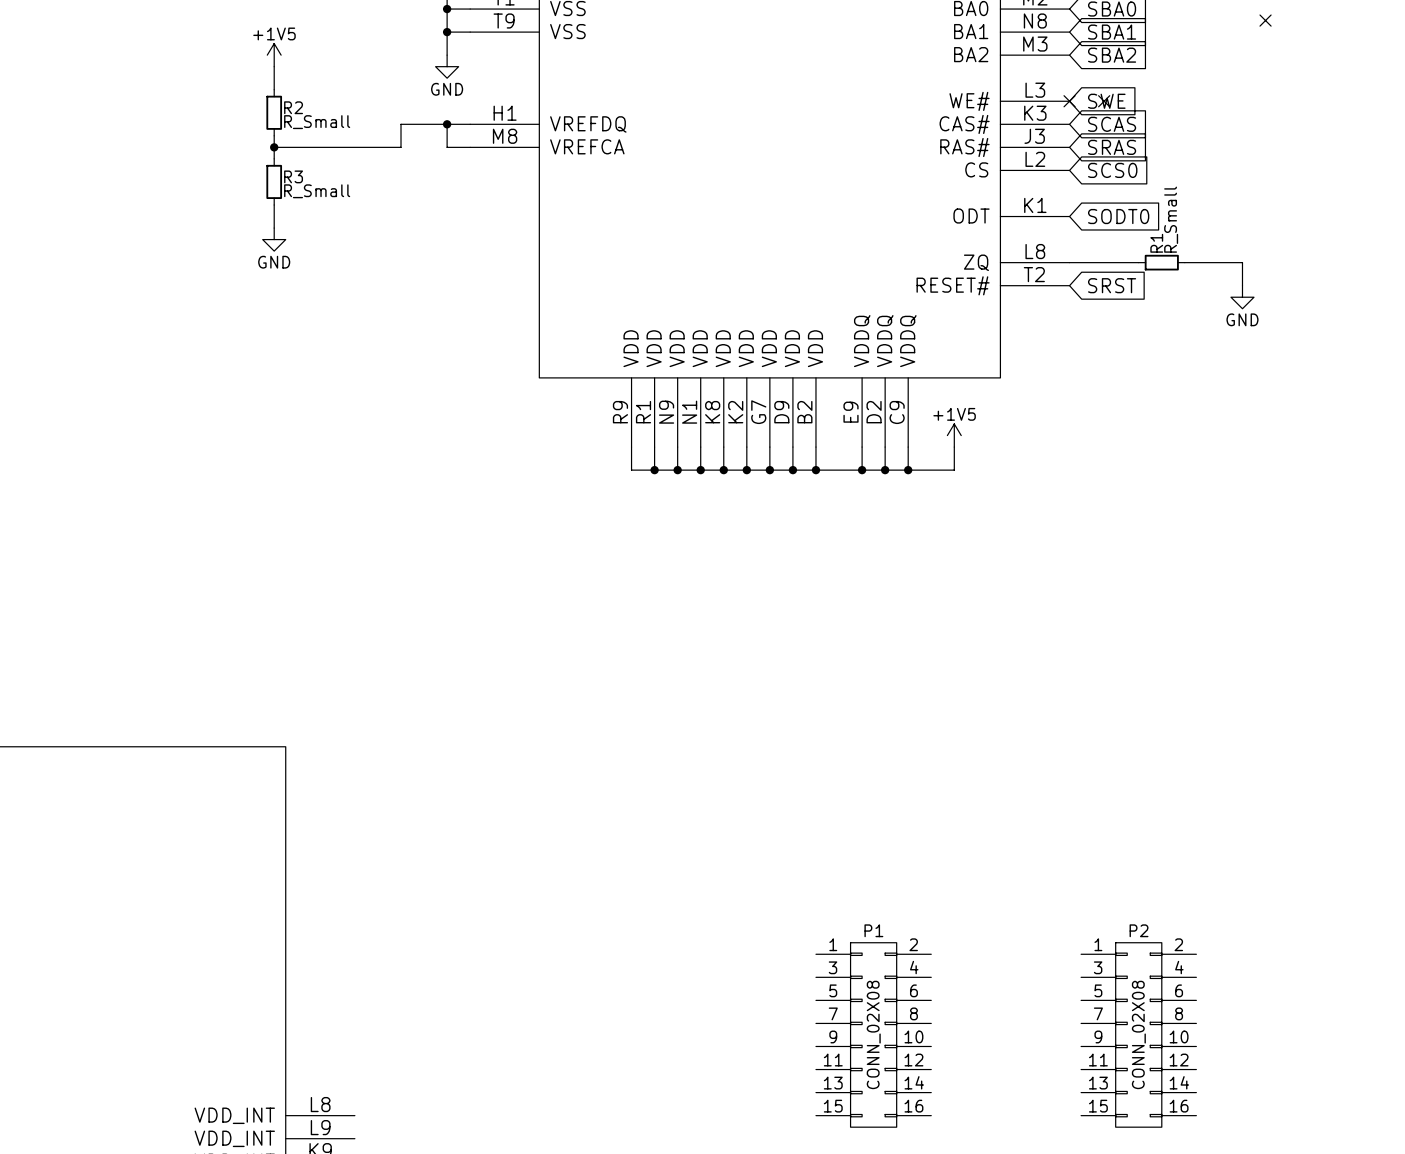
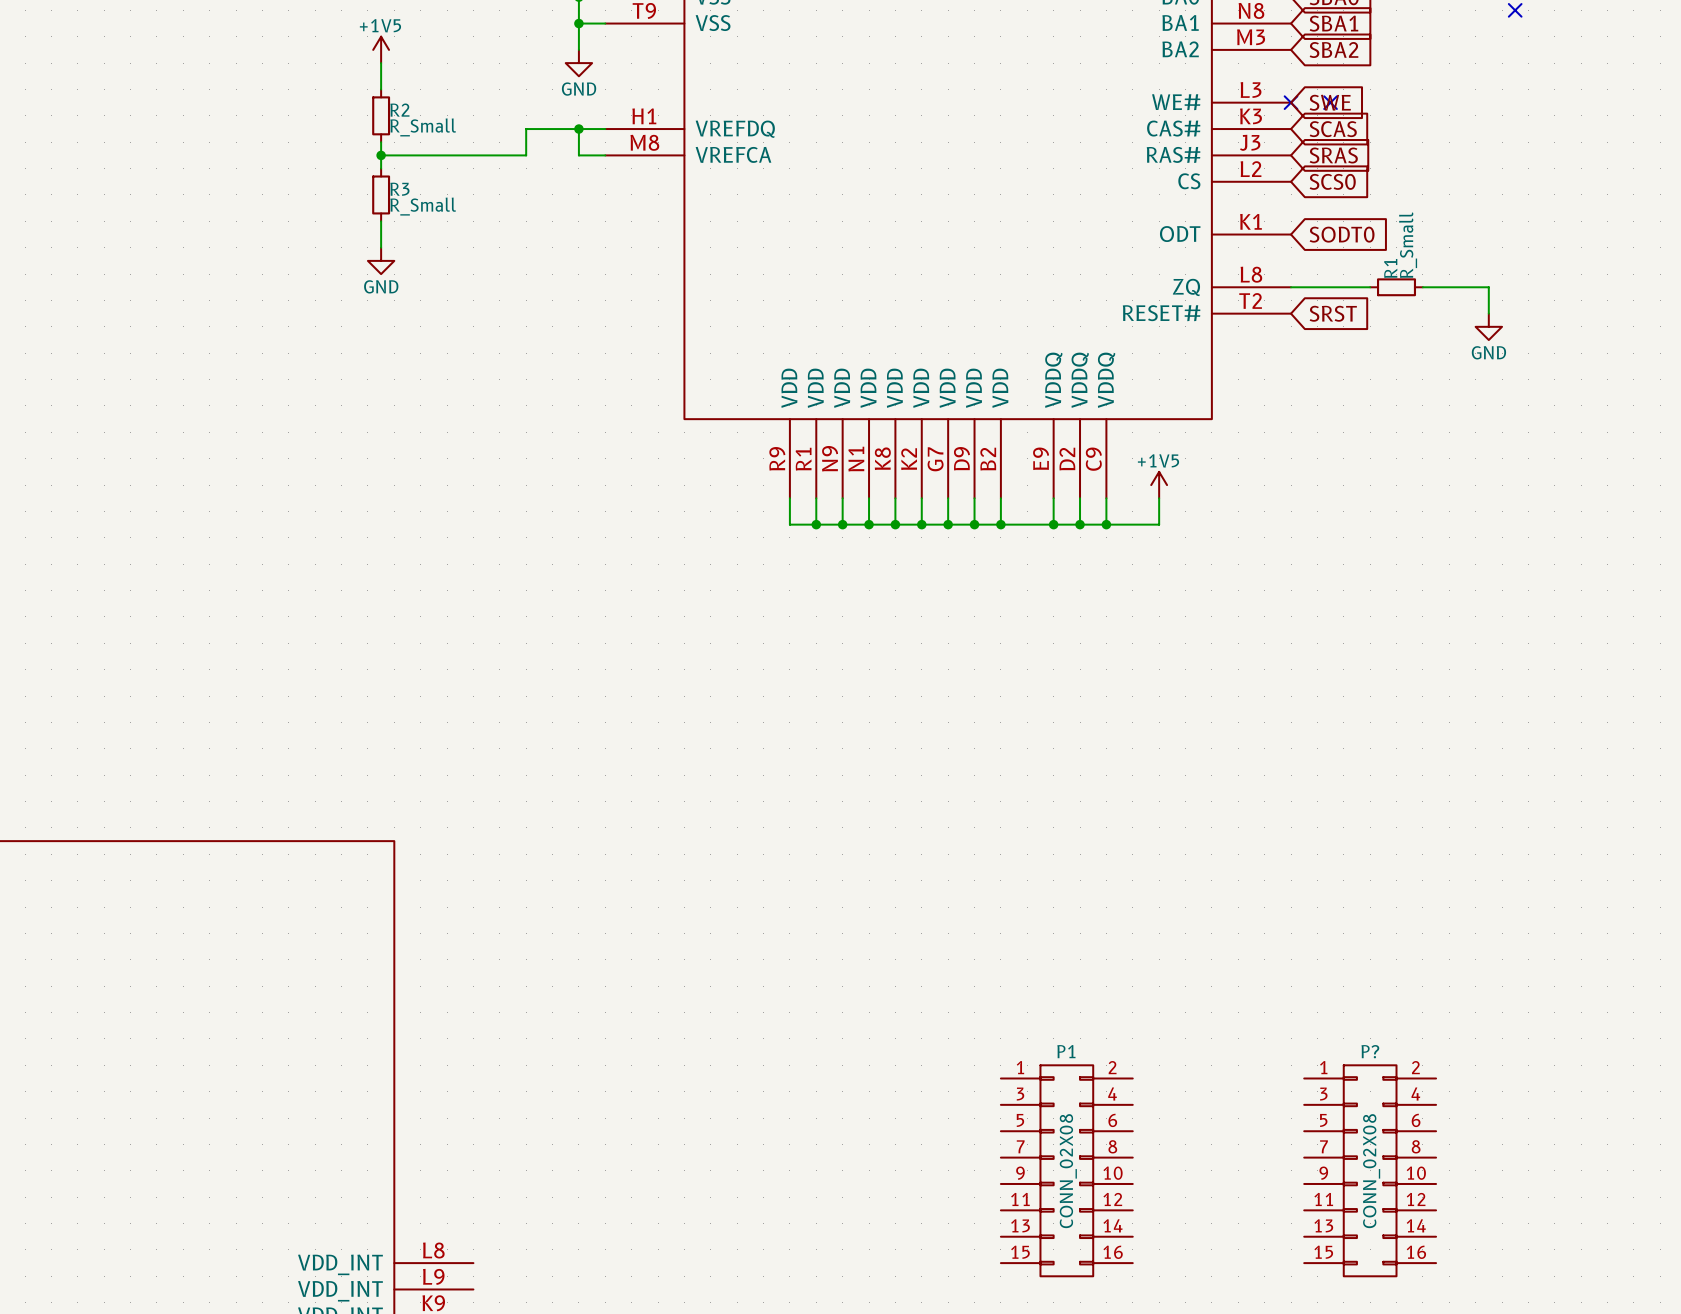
P2 name: P2 (1139, 930) -> P? (1370, 1051)

